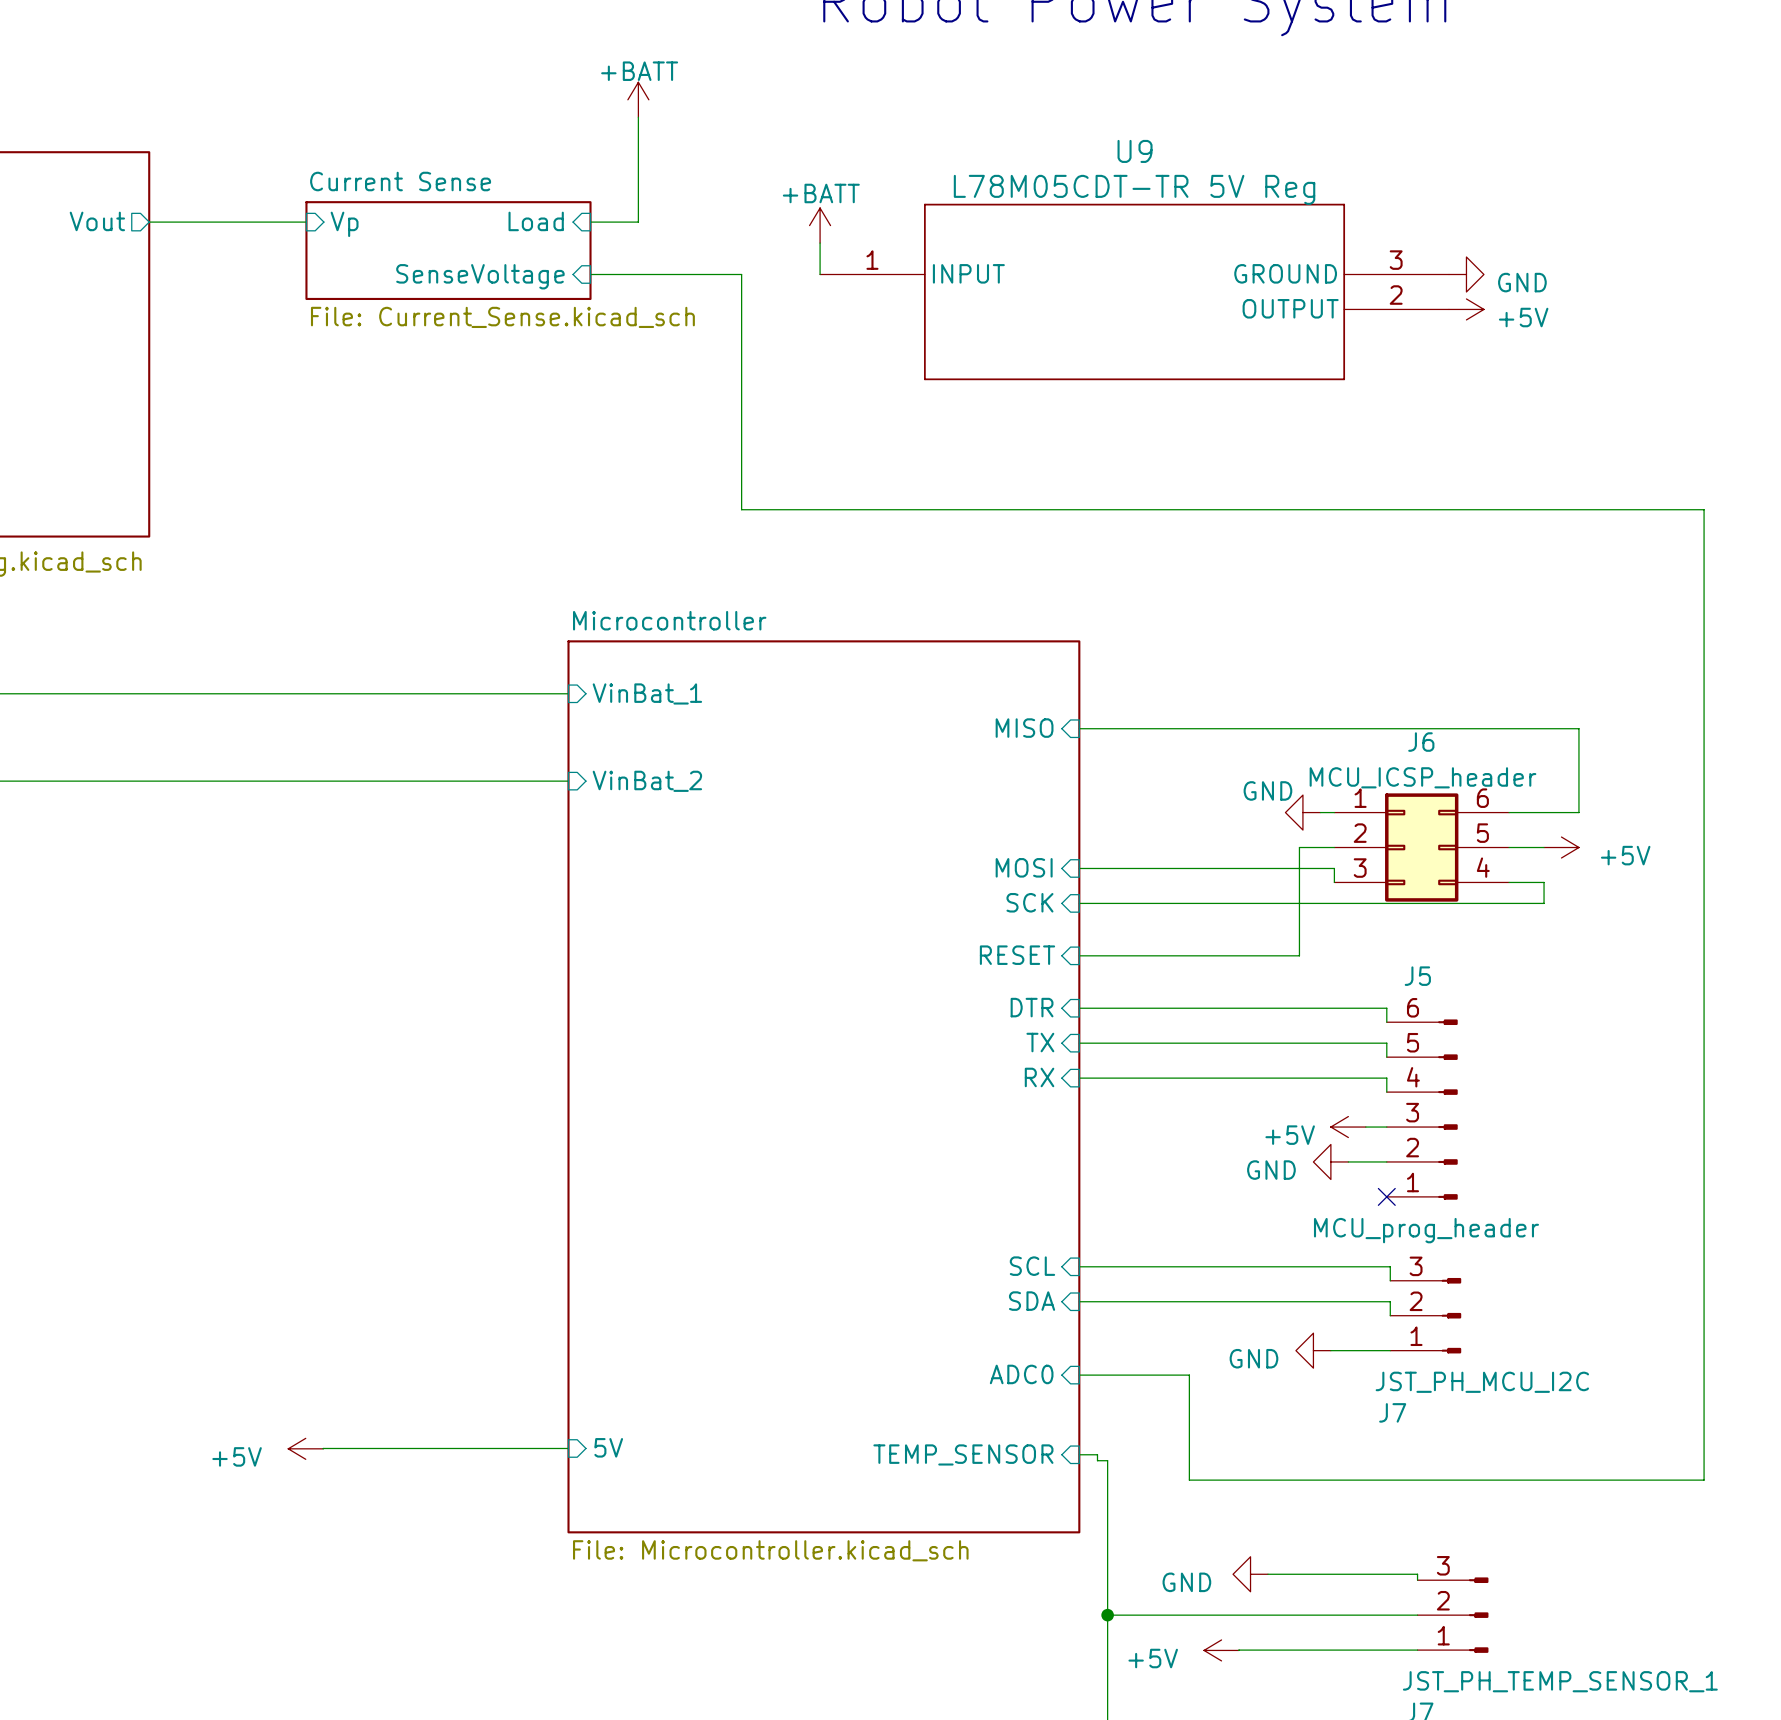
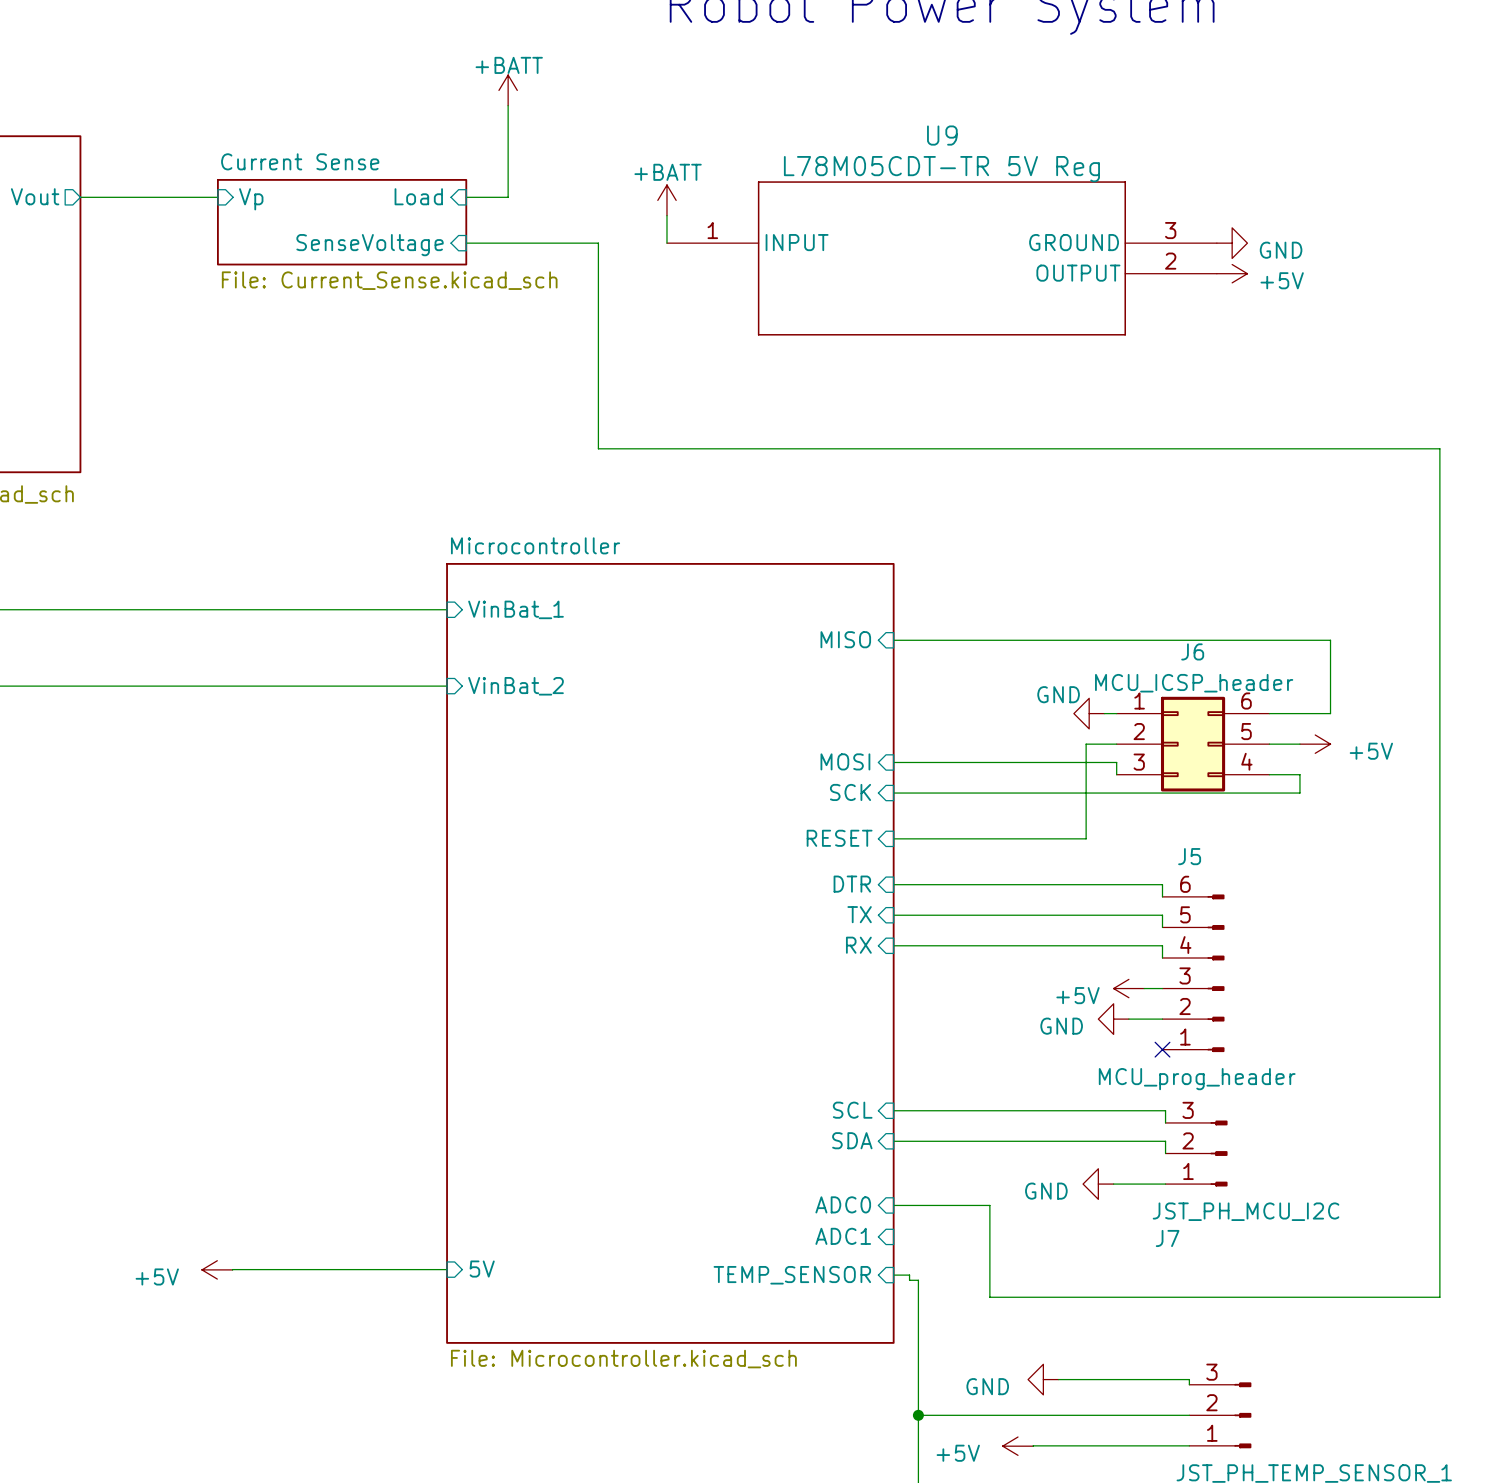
sheet pin: none -> ADC1 (843, 1236)

